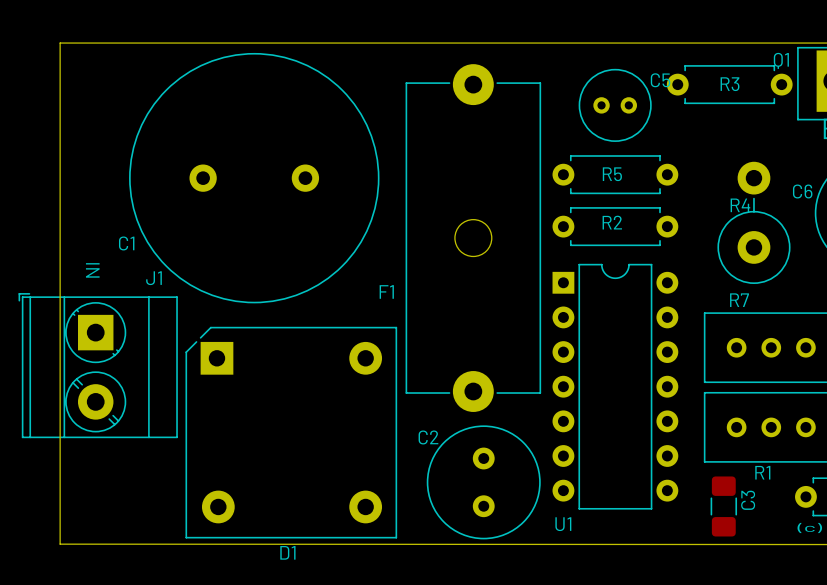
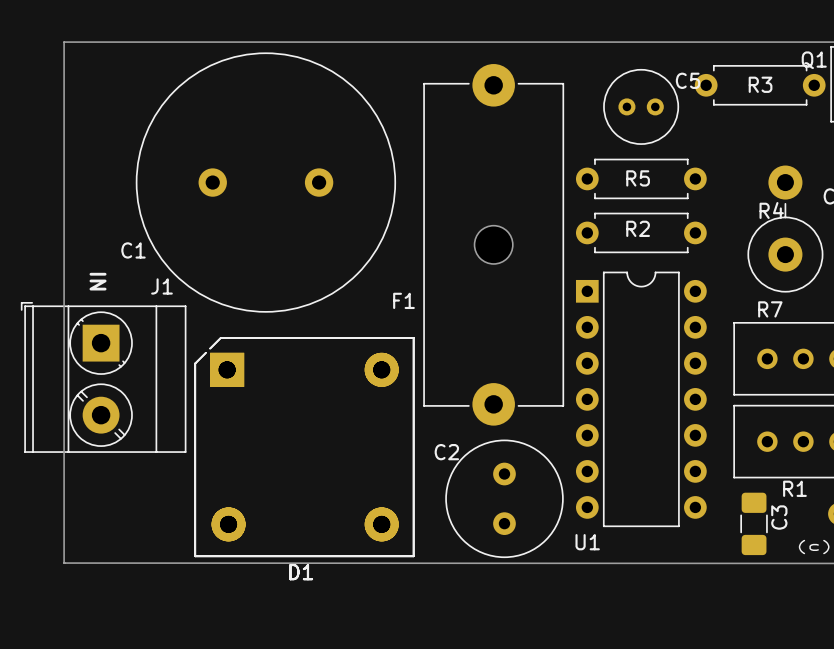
D1: (291, 432) -> none
D1: none -> (304, 447)
D1: none -> (304, 447)

